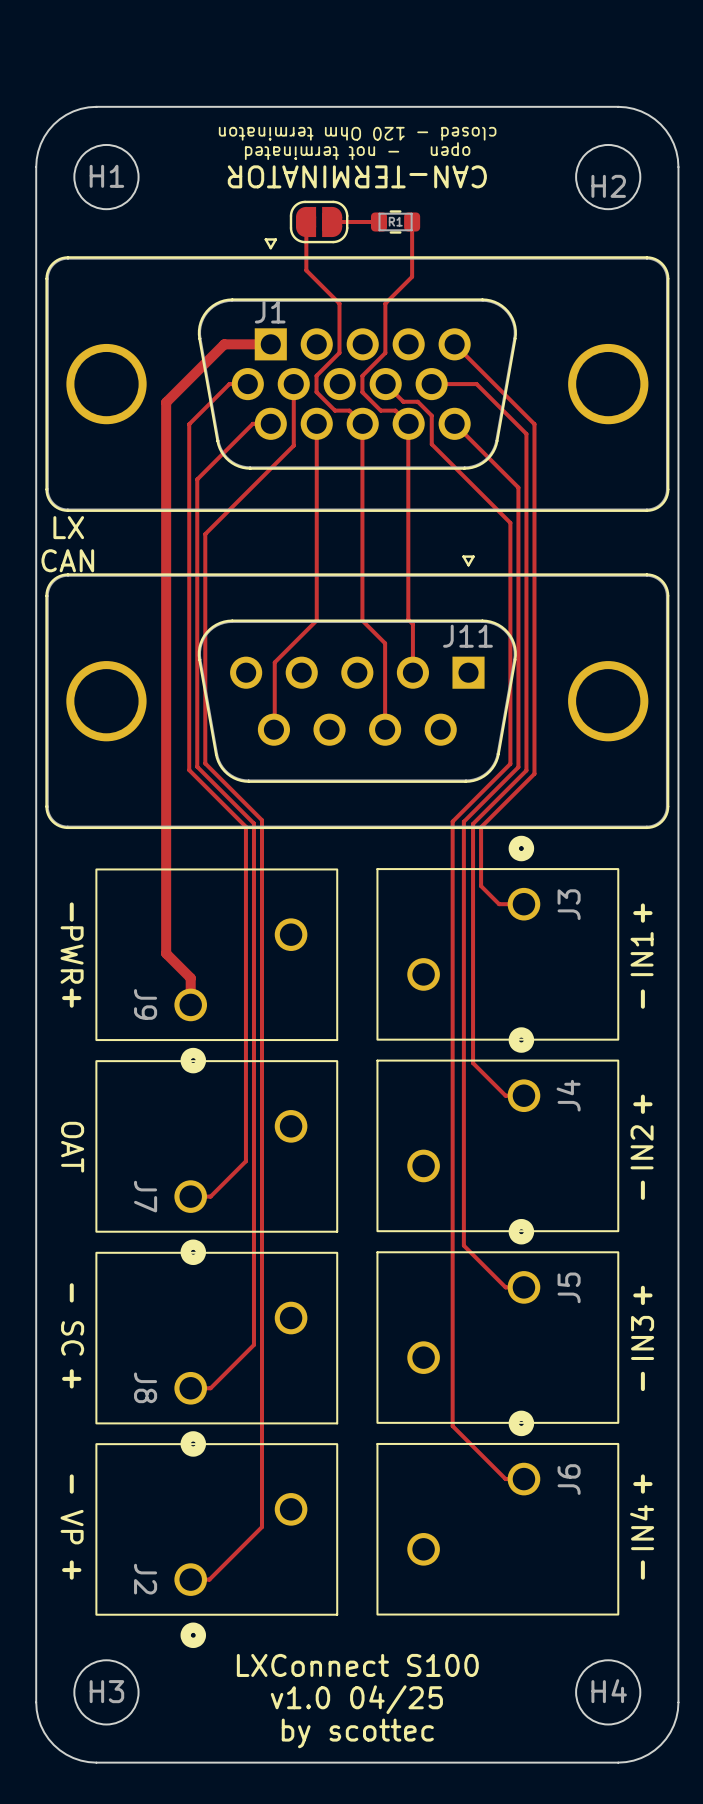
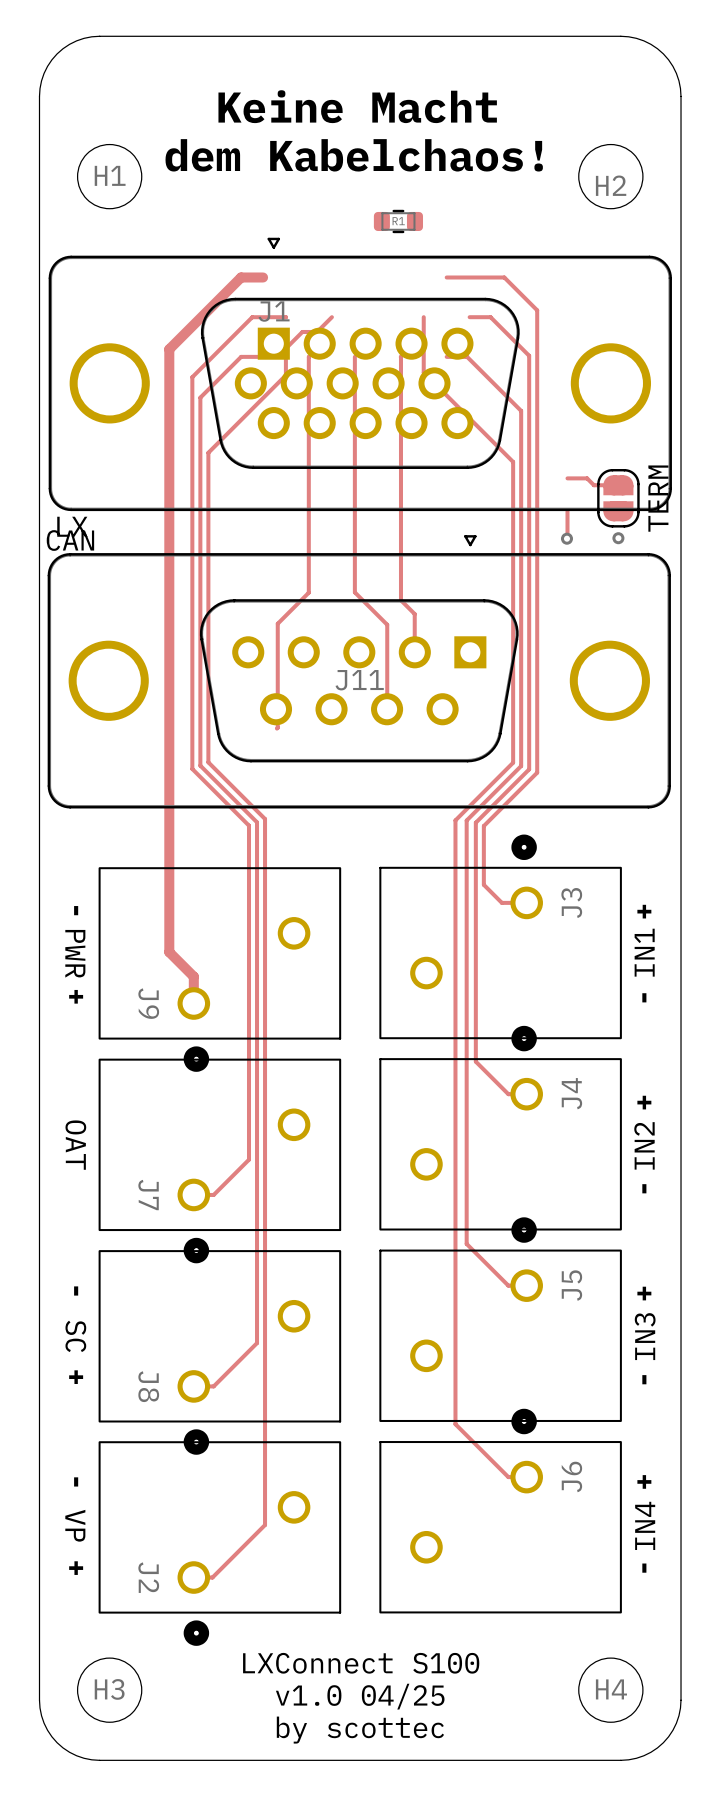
text: none -> Keine Macht (357, 106)
text: closed - 120 Ohm terminaton (357, 133) -> none
text: open - not terminated (357, 151) -> dem Kabelchaos! (354, 155)
board edge: (36, 167) (40, 144) (53, 124) (73, 111) (96, 106) (626, 107) (648, 114) (666, 130) (676, 151) (678, 167) -> (39, 166) (39, 96) (44, 73) (51, 59) (69, 44) (84, 38) (99, 36) (620, 36) (636, 38) (657, 48) (668, 59) (676, 73) (681, 96) (681, 166)
track: (306, 221) (306, 270) (339, 303) (339, 352) (316, 375) (316, 392) (335, 410) (349, 410) (362, 423) (362, 620) (385, 643) (385, 729) -> none
part: CAN-TERMINATOR (319, 221) -> none
track: (332, 221) (379, 221) -> none
track: (412, 221) (412, 276) (385, 303) (385, 352) (362, 375) (362, 392) (380, 410) (395, 410) (408, 423) (408, 619) (412, 624) (412, 672) -> none
track: (270, 344) (224, 344) (166, 402) -> (263, 277) (241, 277) (169, 349) (169, 401)
track: (454, 344) (534, 424) -> (446, 277) (504, 277) (537, 310) (537, 423)
track: none -> (354, 356) (354, 592) (387, 624) (387, 709)
track: none -> (400, 357) (400, 600) (414, 614) (414, 652)
track: (247, 384) (229, 384) (189, 424) -> (285, 317) (252, 317) (192, 377) (192, 423)
track: (293, 384) (293, 445) (205, 534) -> (331, 317) (317, 331) (302, 331) (285, 348) (285, 375) (208, 452) (208, 533)
track: (385, 384) (403, 401) (417, 401) (431, 415) (431, 444) (510, 522) -> (423, 317) (423, 372) (513, 461) (513, 522)
track: (431, 384) (476, 384) (526, 433) -> (469, 317) (490, 317) (529, 355) (529, 433)
track: (270, 423) (252, 423) (197, 479) -> (263, 356) (241, 356) (200, 397) (200, 478)
track: (316, 423) (316, 620) (274, 662) -> (308, 357) (308, 592) (277, 623) (277, 661)
track: (454, 423) (518, 487) -> (446, 356) (467, 356) (521, 410) (521, 486)
track: none -> (567, 478) (587, 478) (593, 485) (618, 485)
part: none -> TERM (618, 498)
track: none -> (567, 511) (566, 538)
via: none -> (566, 538)
via: none -> (618, 538)
J11 name position: J11 (467, 636) -> J11 (359, 680)
J11 position: (357, 692) -> (359, 671)

